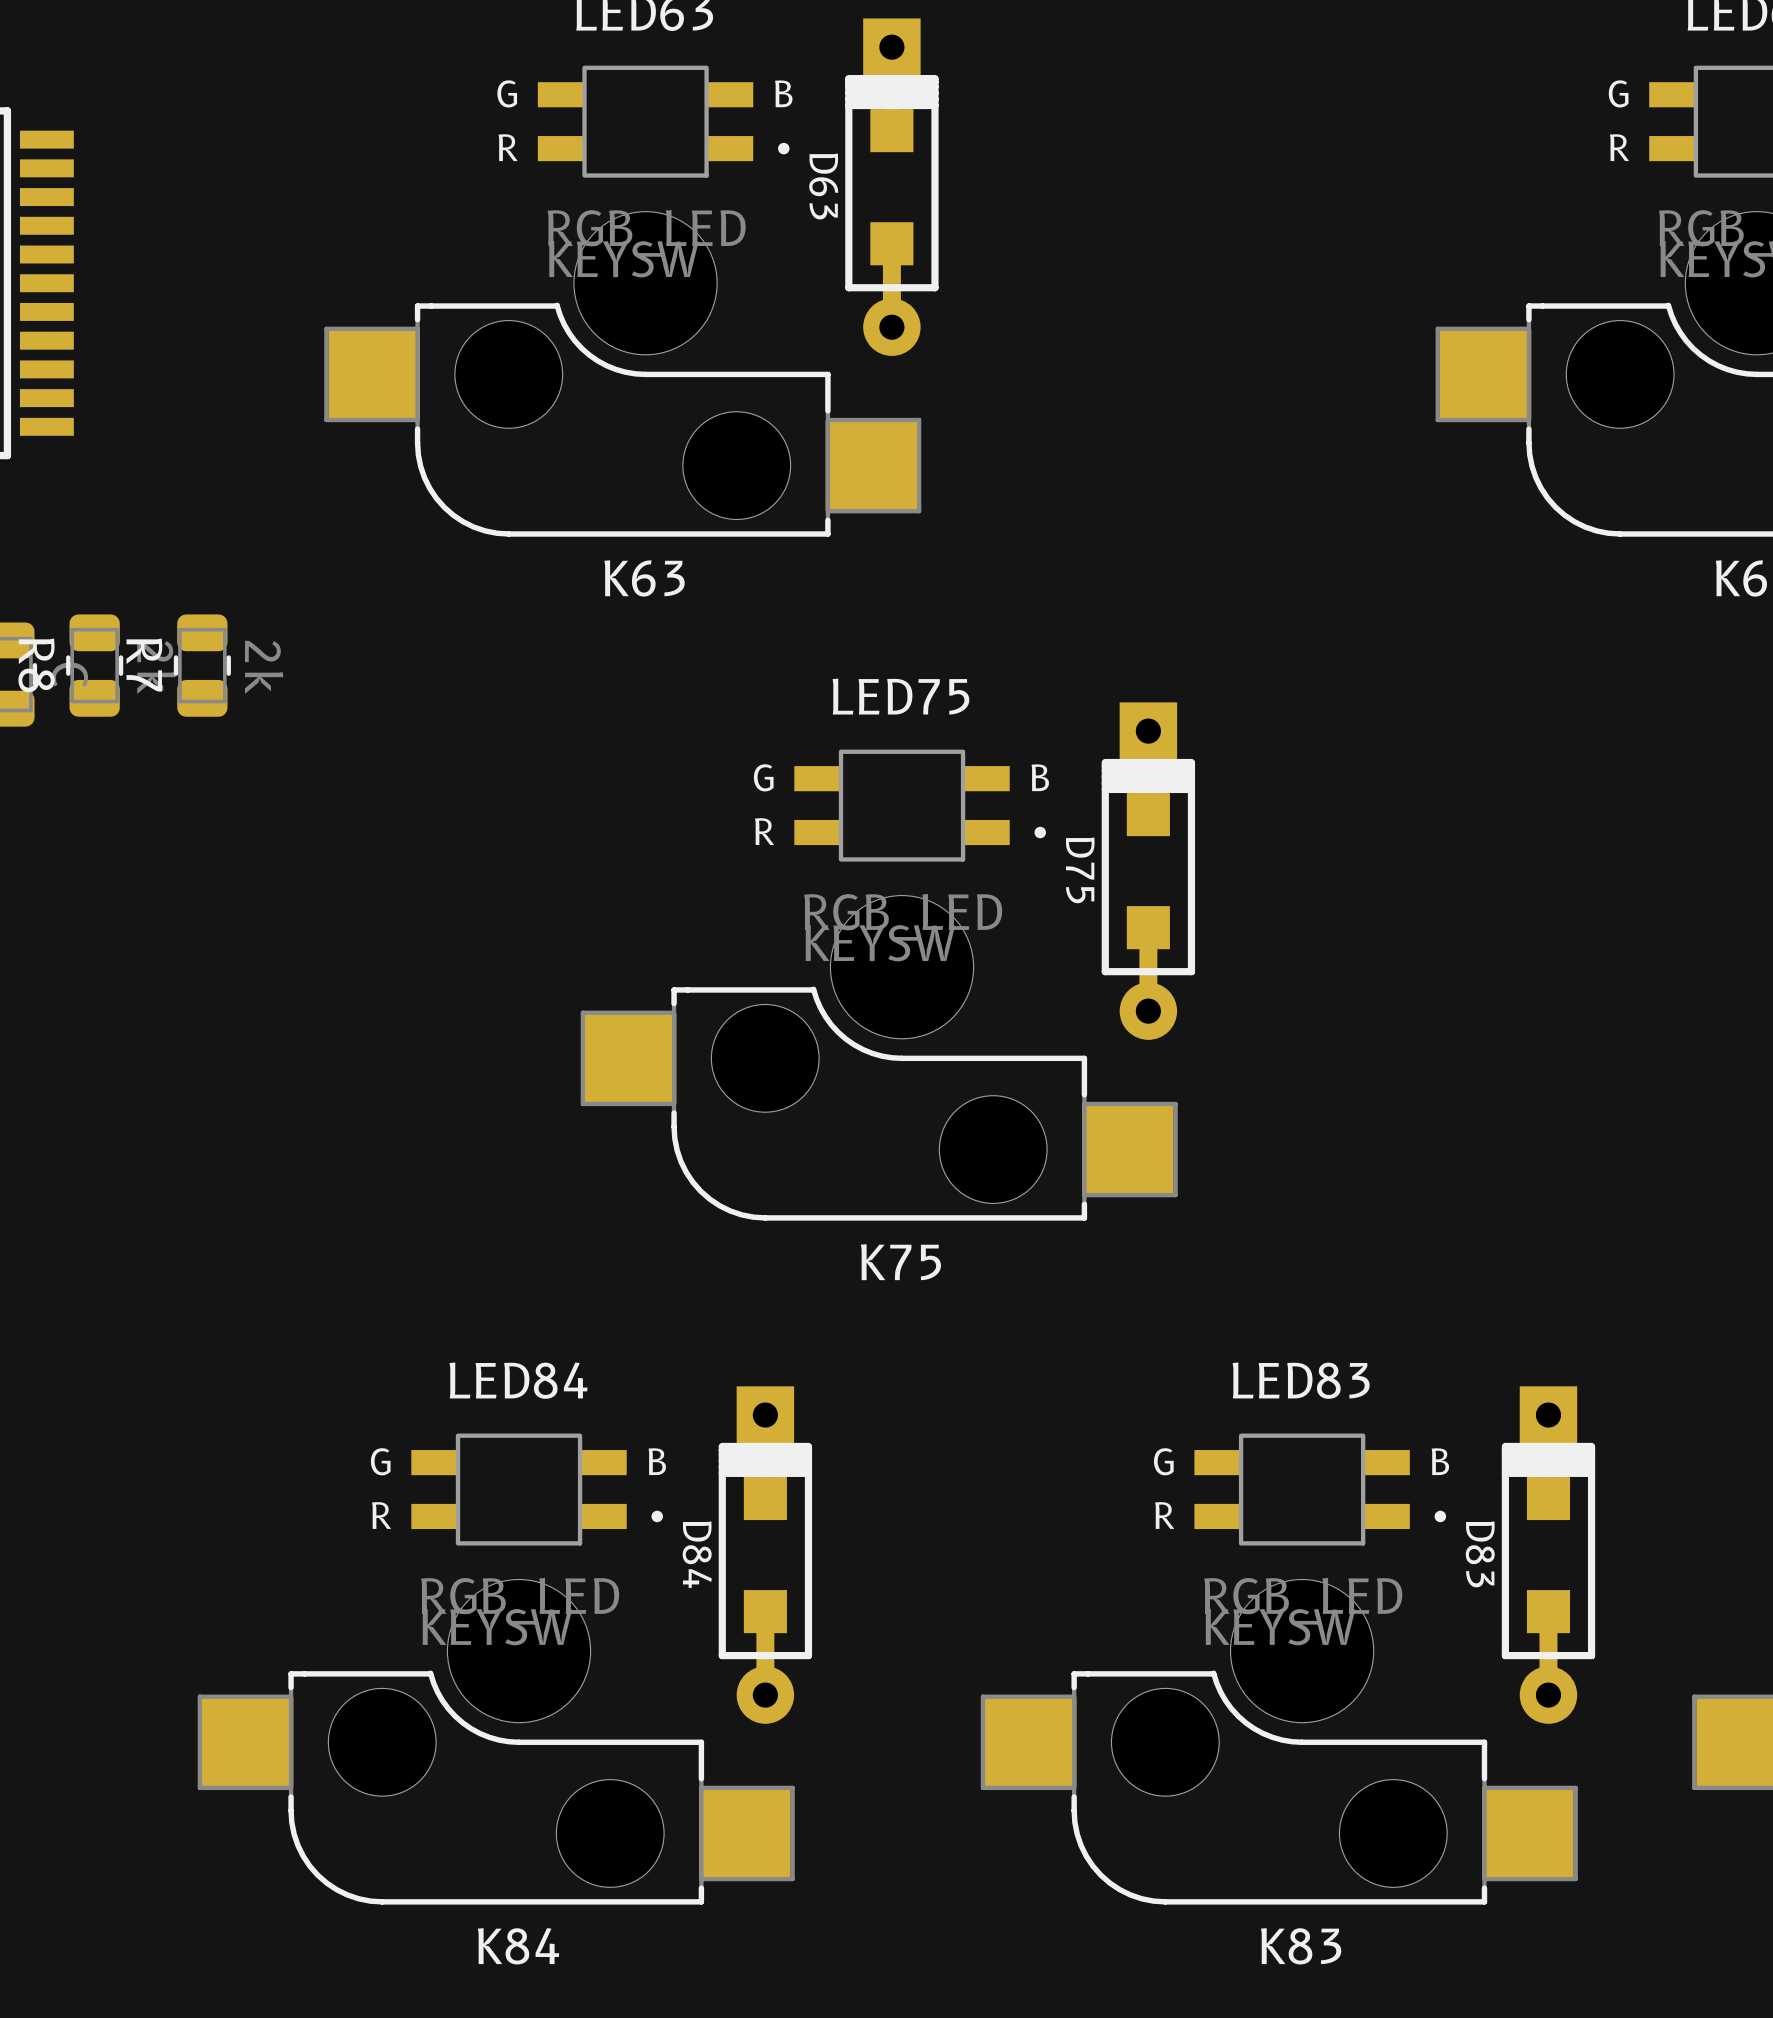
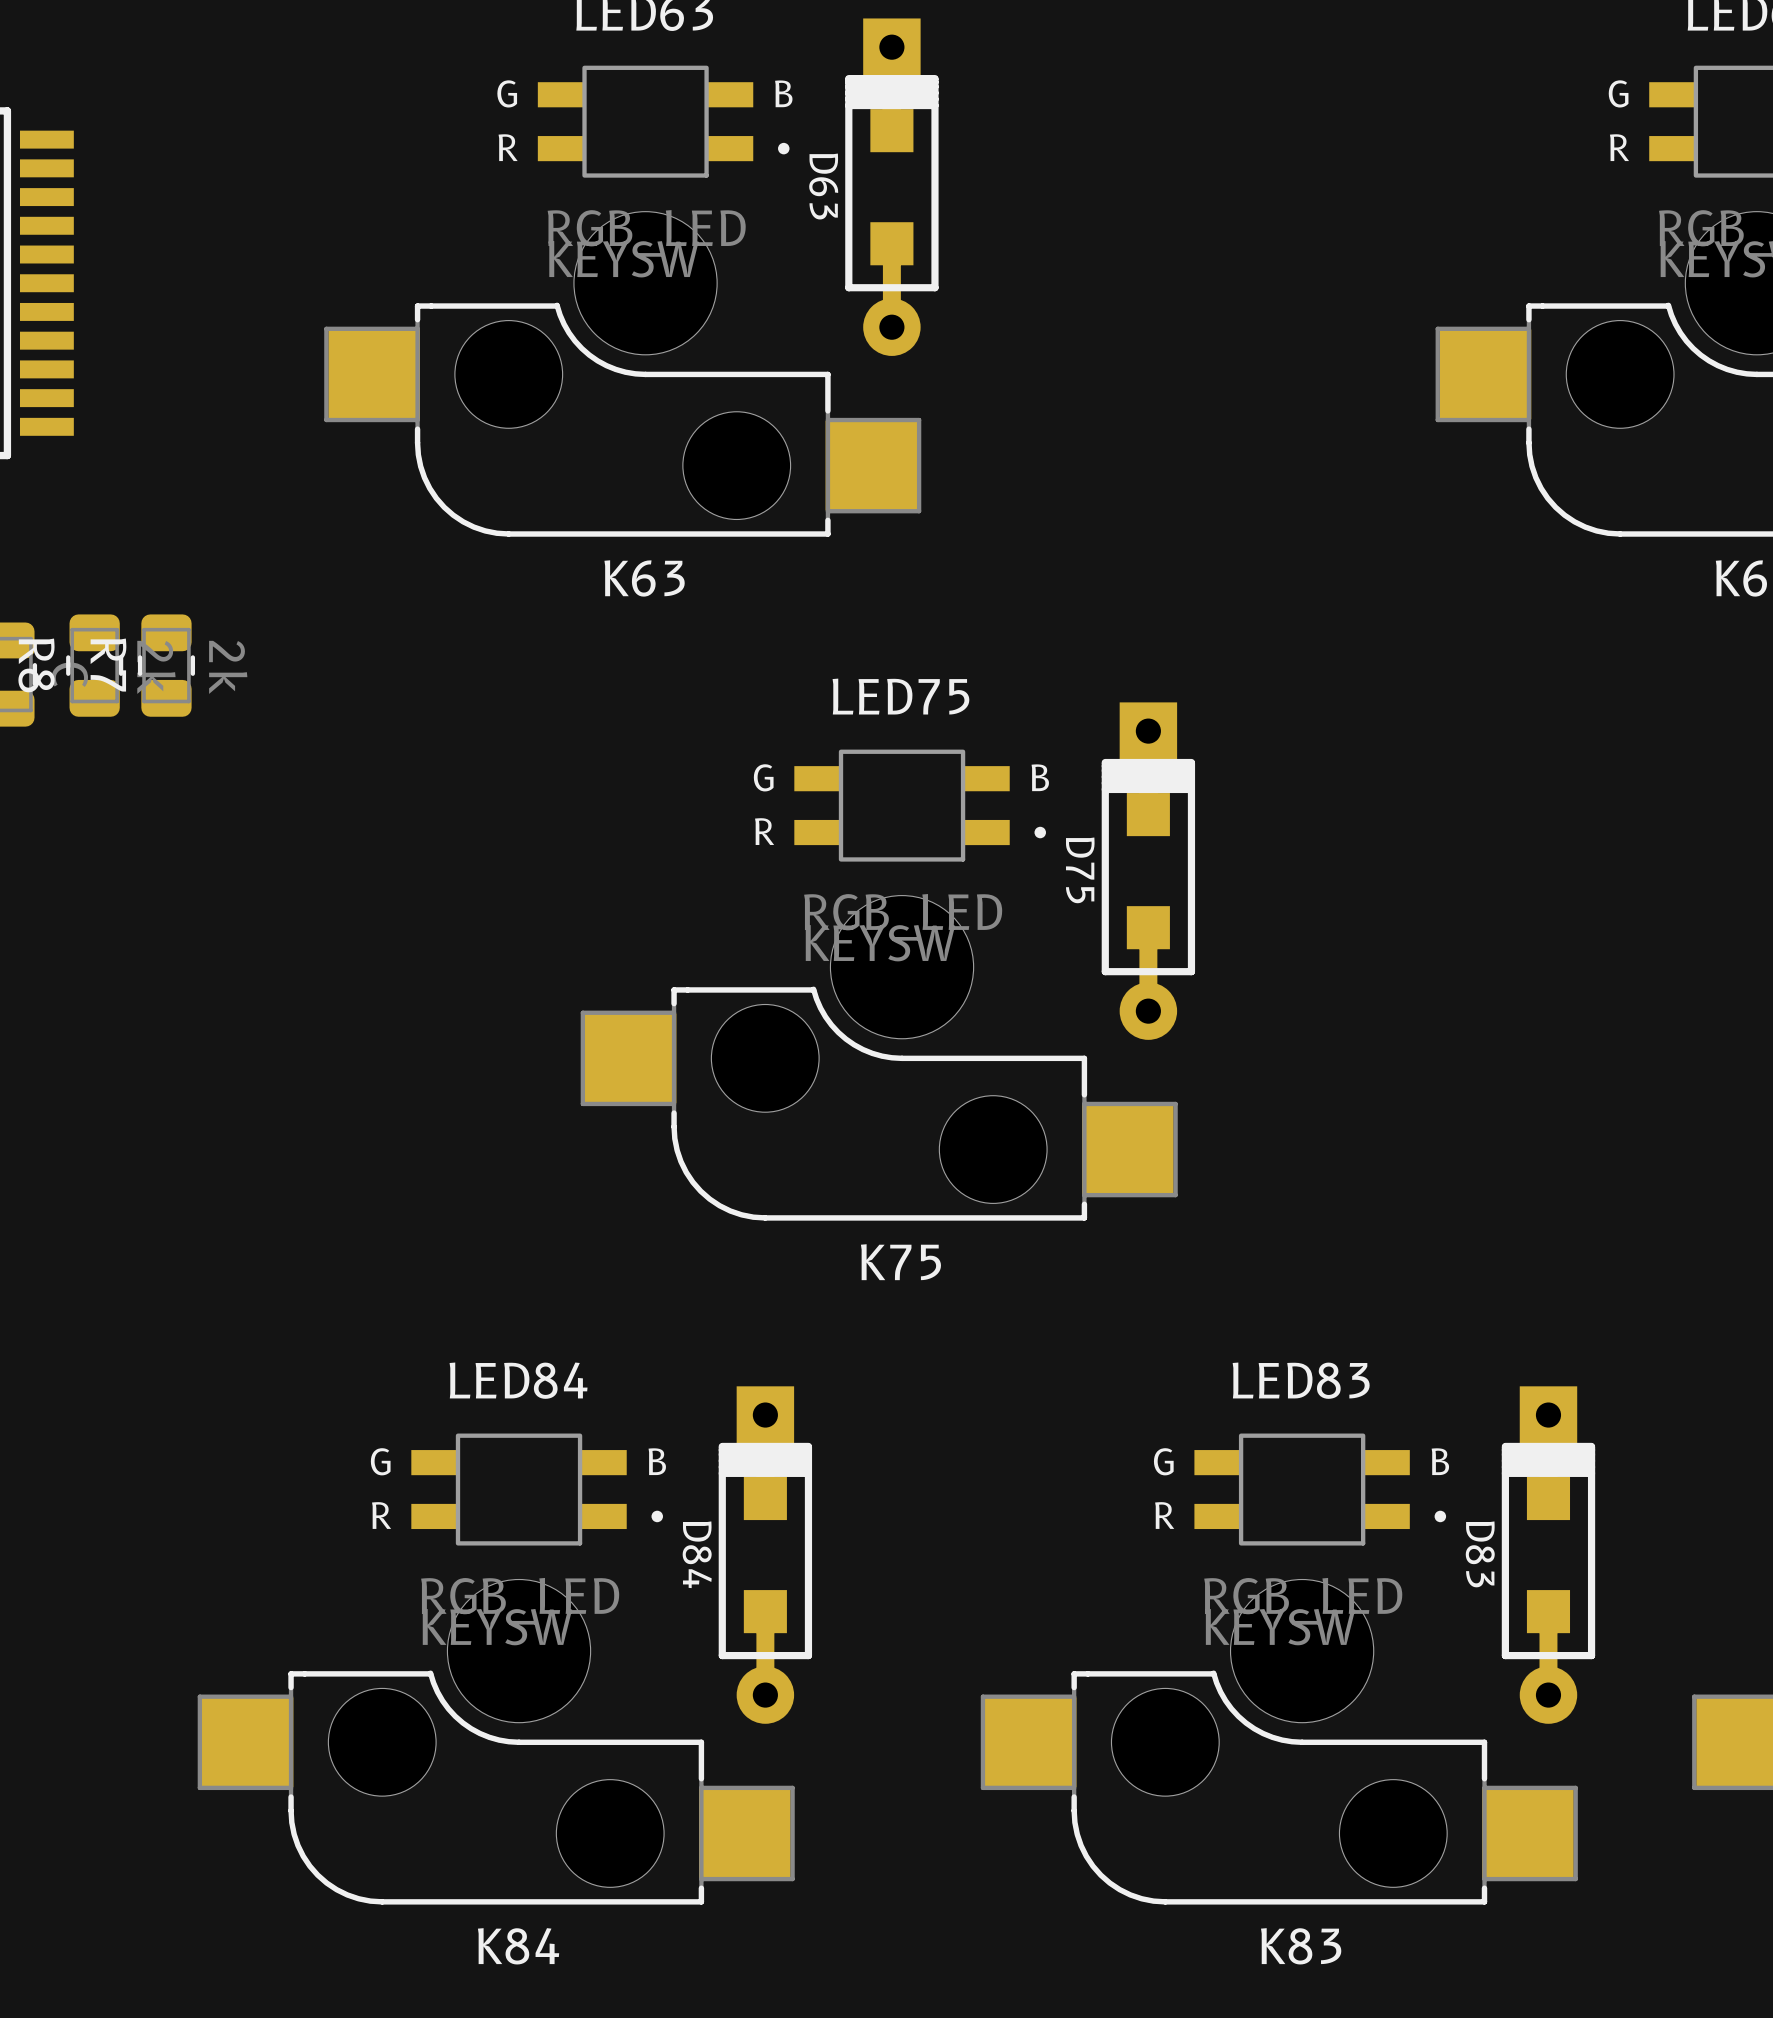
R7 position: (202, 665) -> (166, 665)

